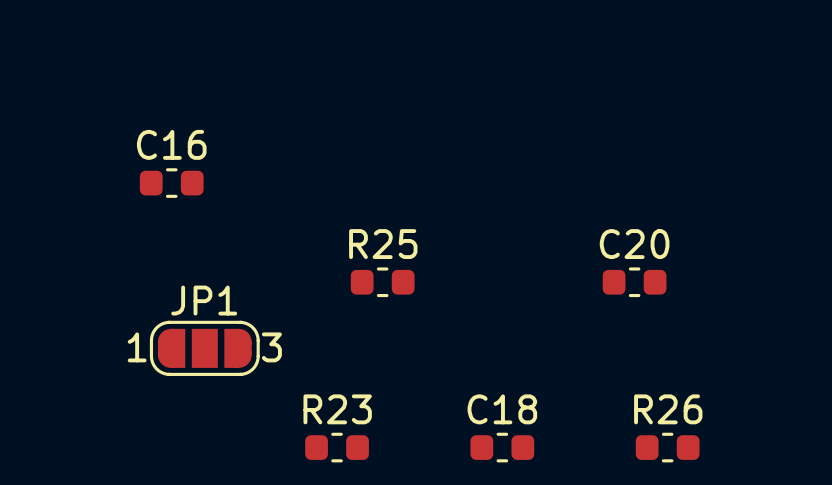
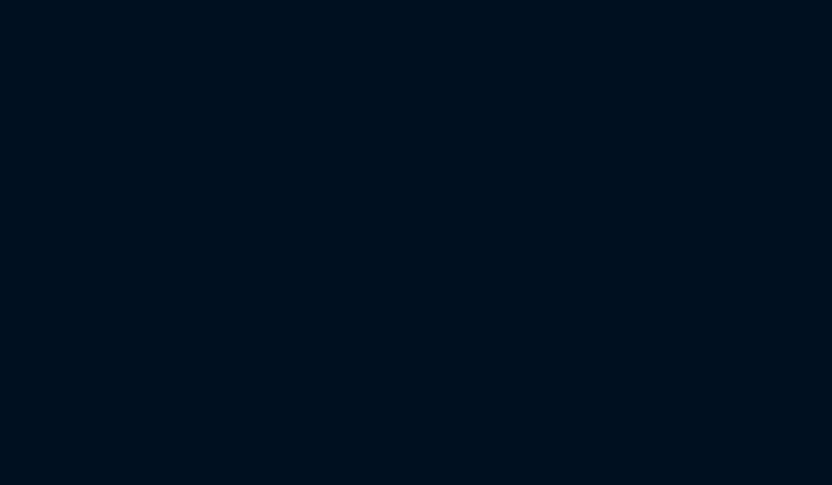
C16: (171, 183) -> none
R25: (382, 282) -> none
C20: (634, 282) -> none
JP1: (204, 348) -> none
R23: (337, 447) -> none
C18: (502, 447) -> none
R26: (667, 447) -> none

